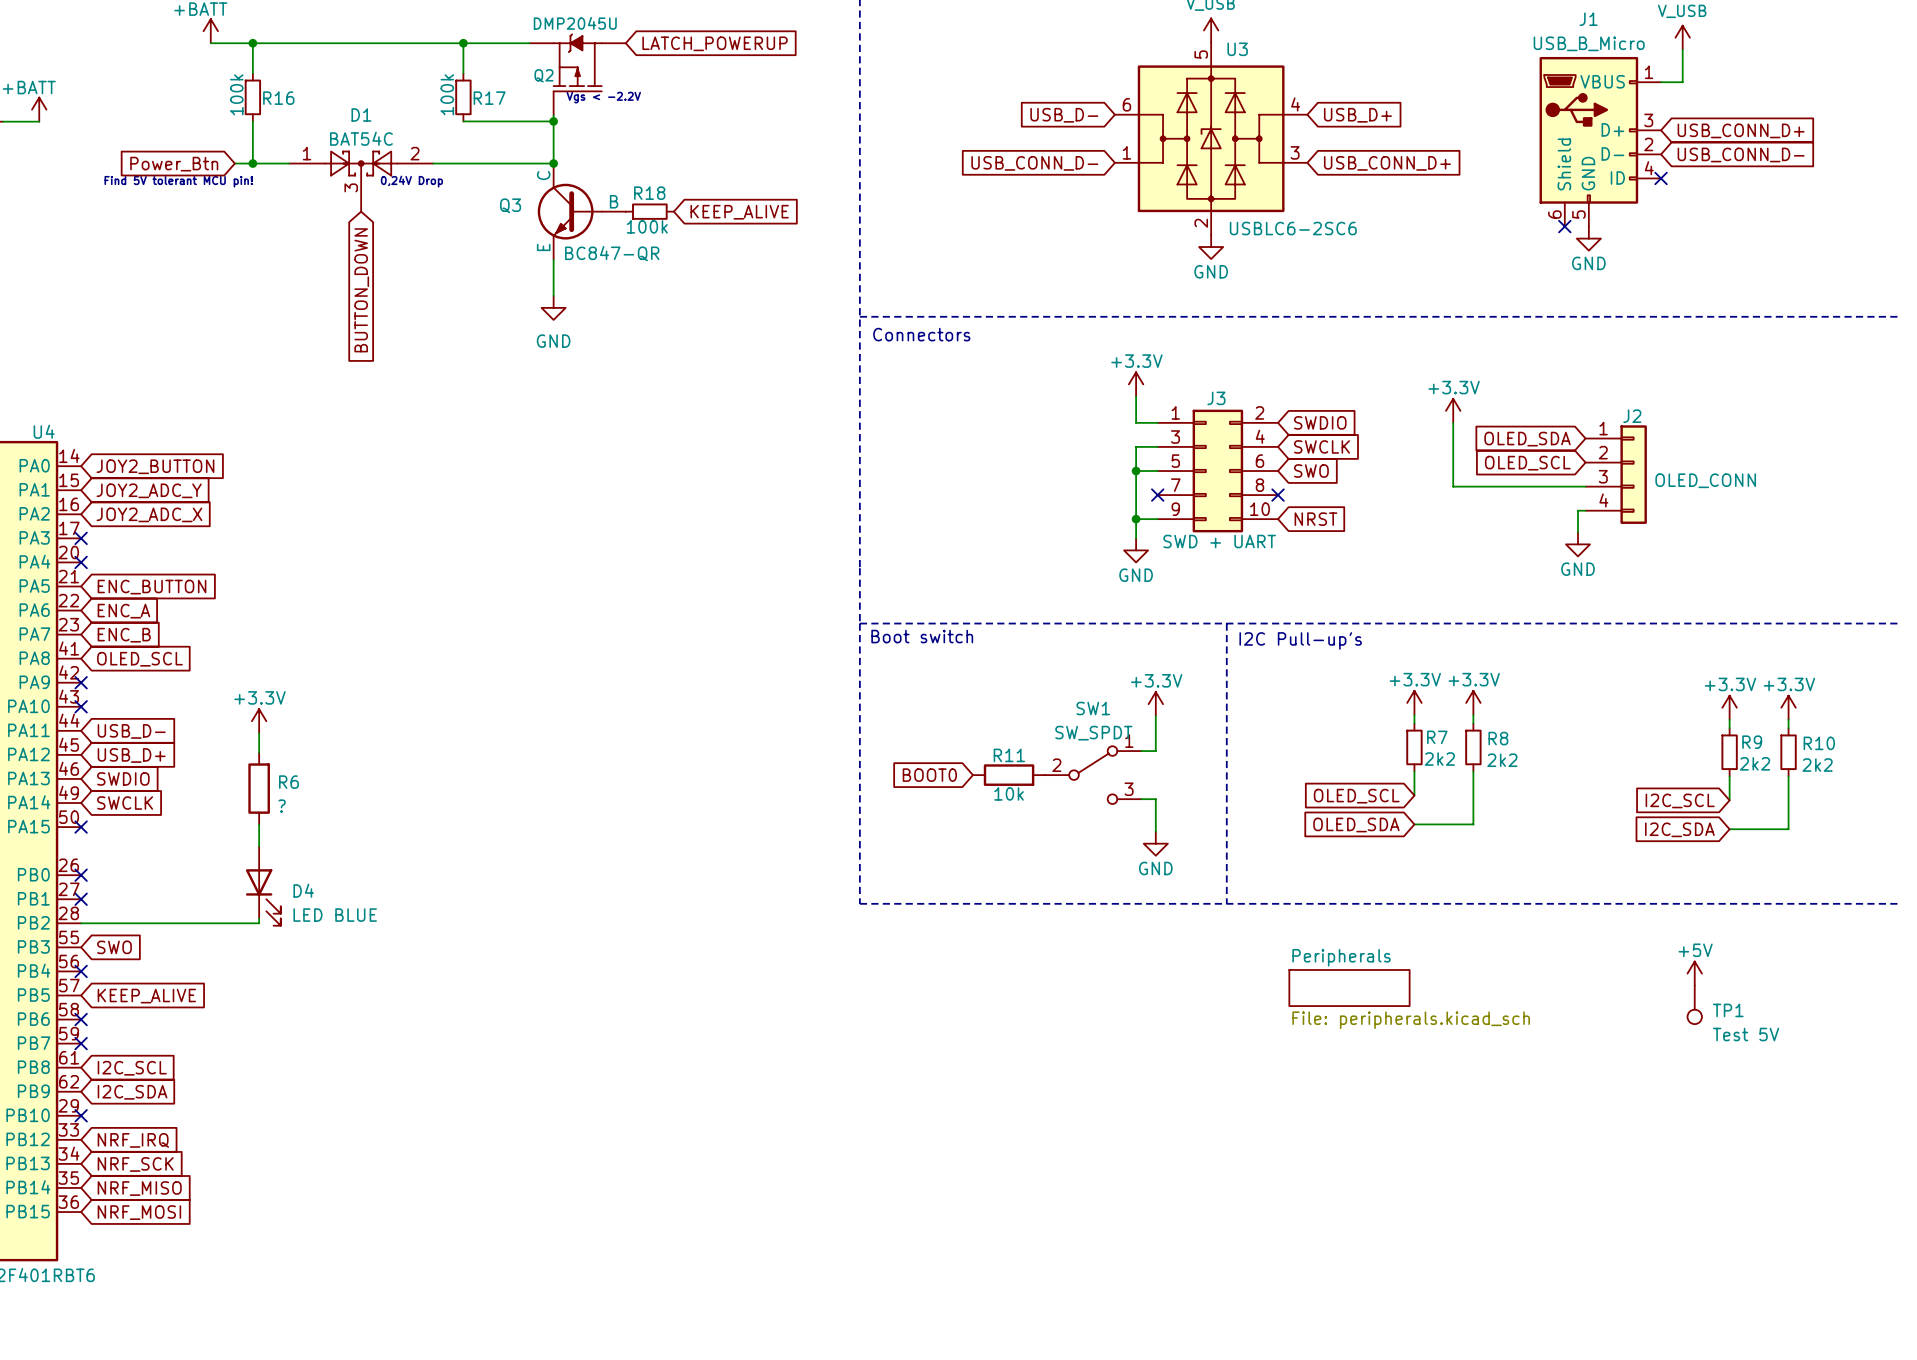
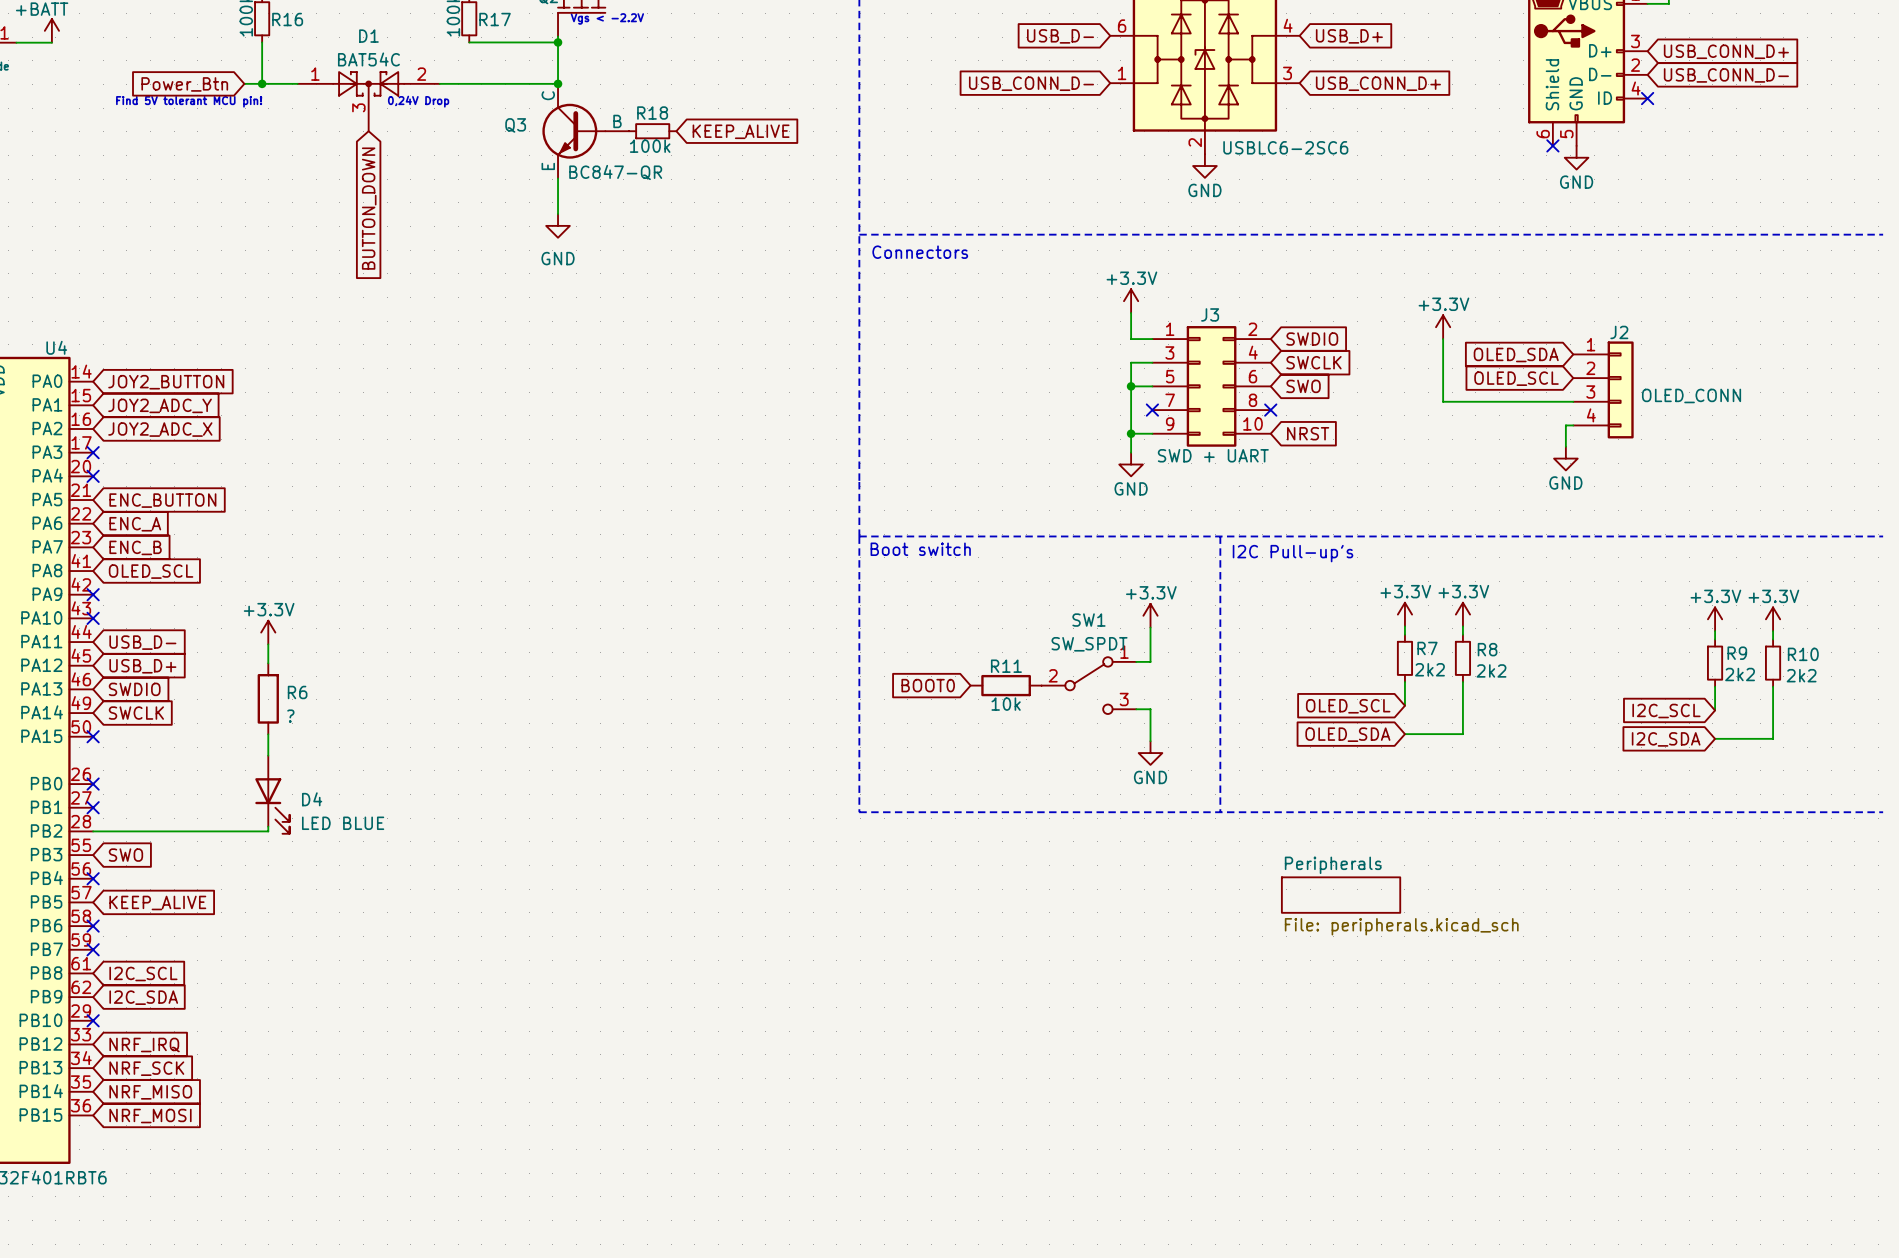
power symbol: +5V (1694, 973) -> none
TP1: Test 5V (1694, 1004) -> none

